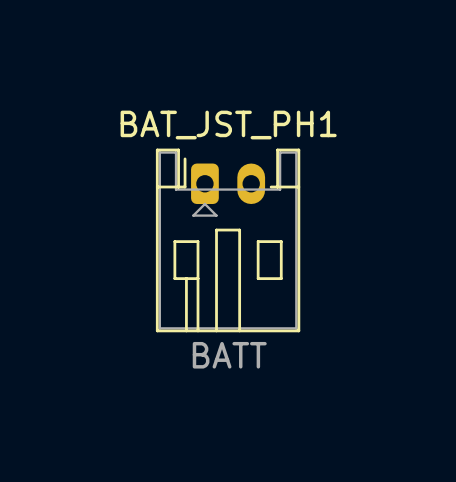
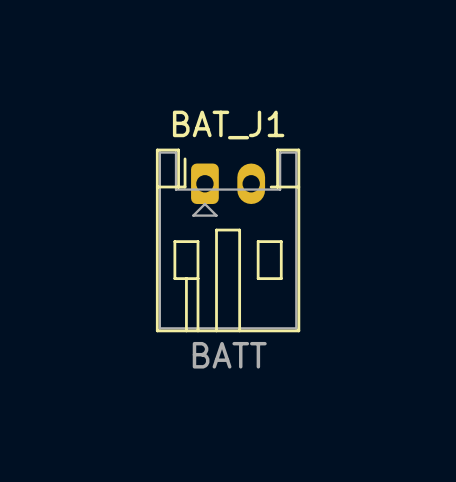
BAT_JST_PH1 name: BAT_JST_PH1 (228, 125) -> BAT_J1 (228, 125)

